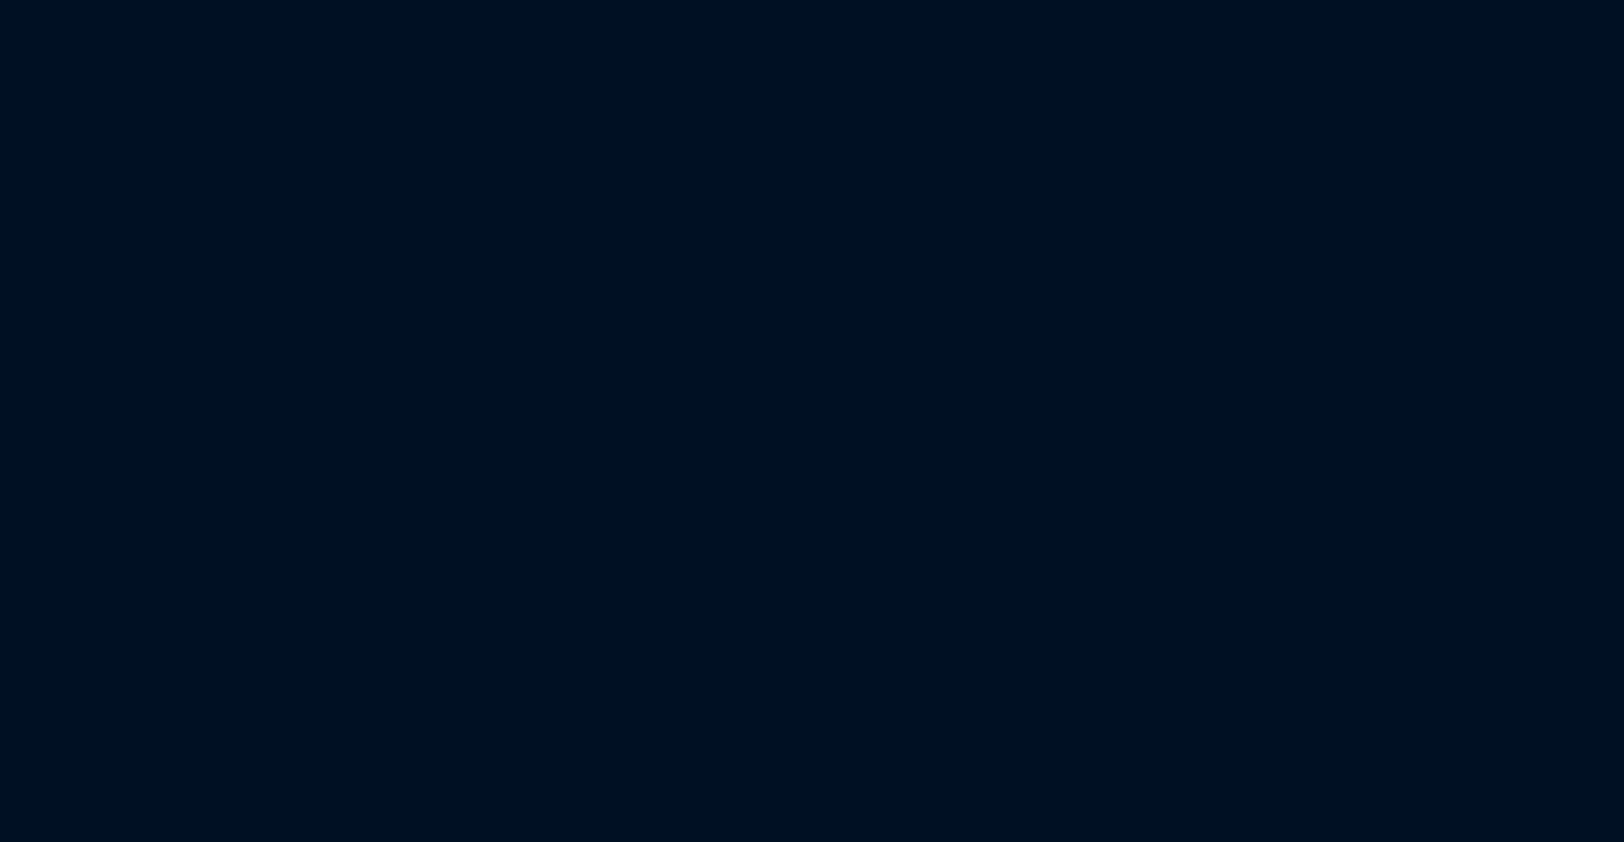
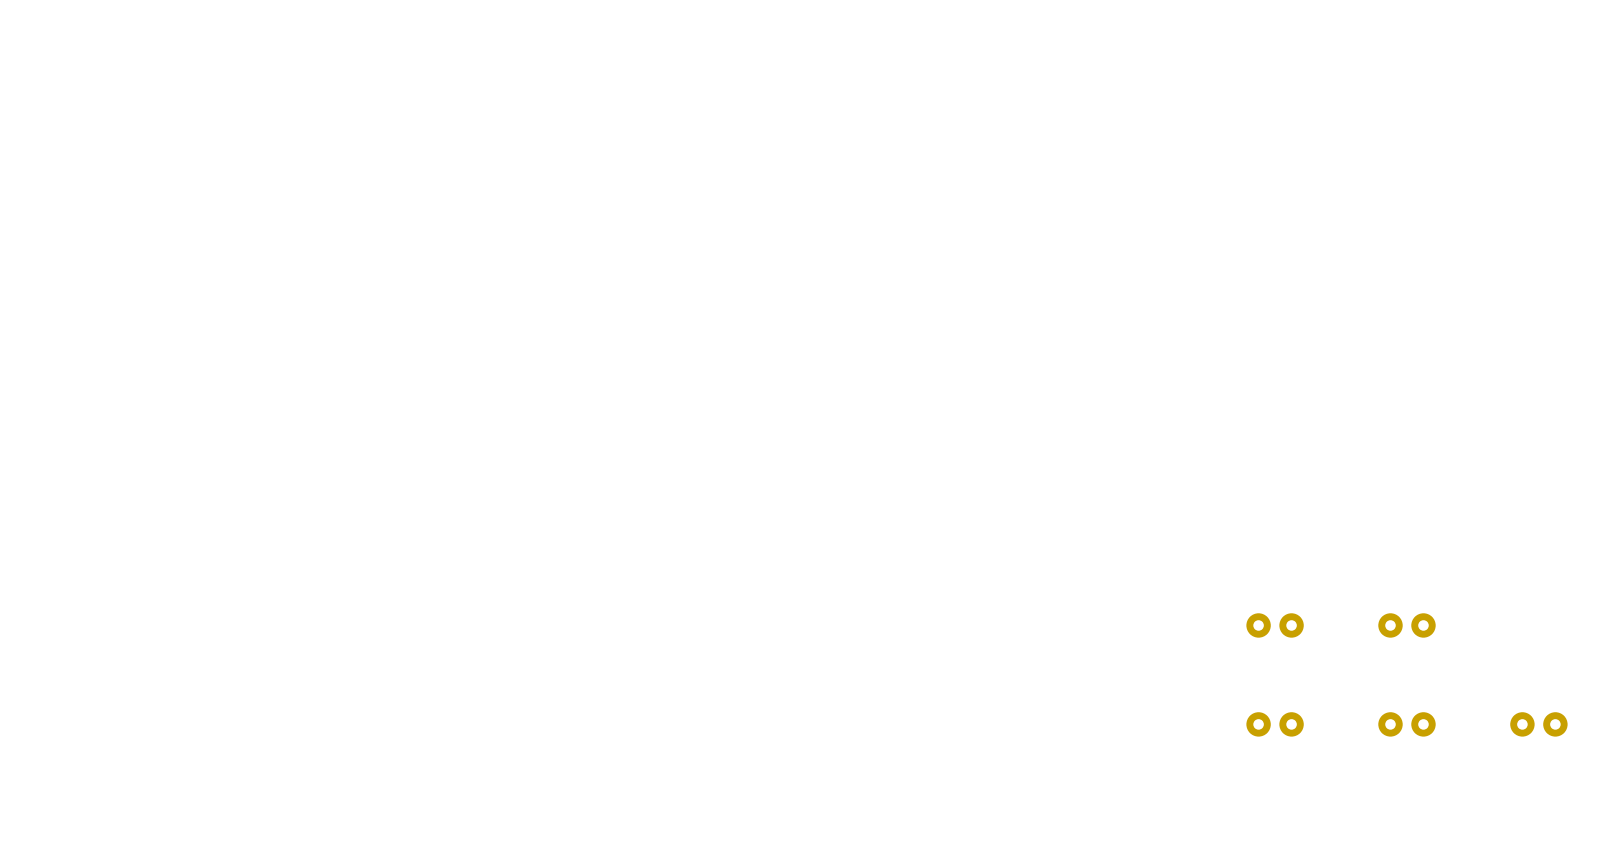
part: none -> (1275, 625)
part: none -> (1406, 625)
part: none -> (1275, 724)
part: none -> (1406, 724)
part: none -> (1538, 724)

